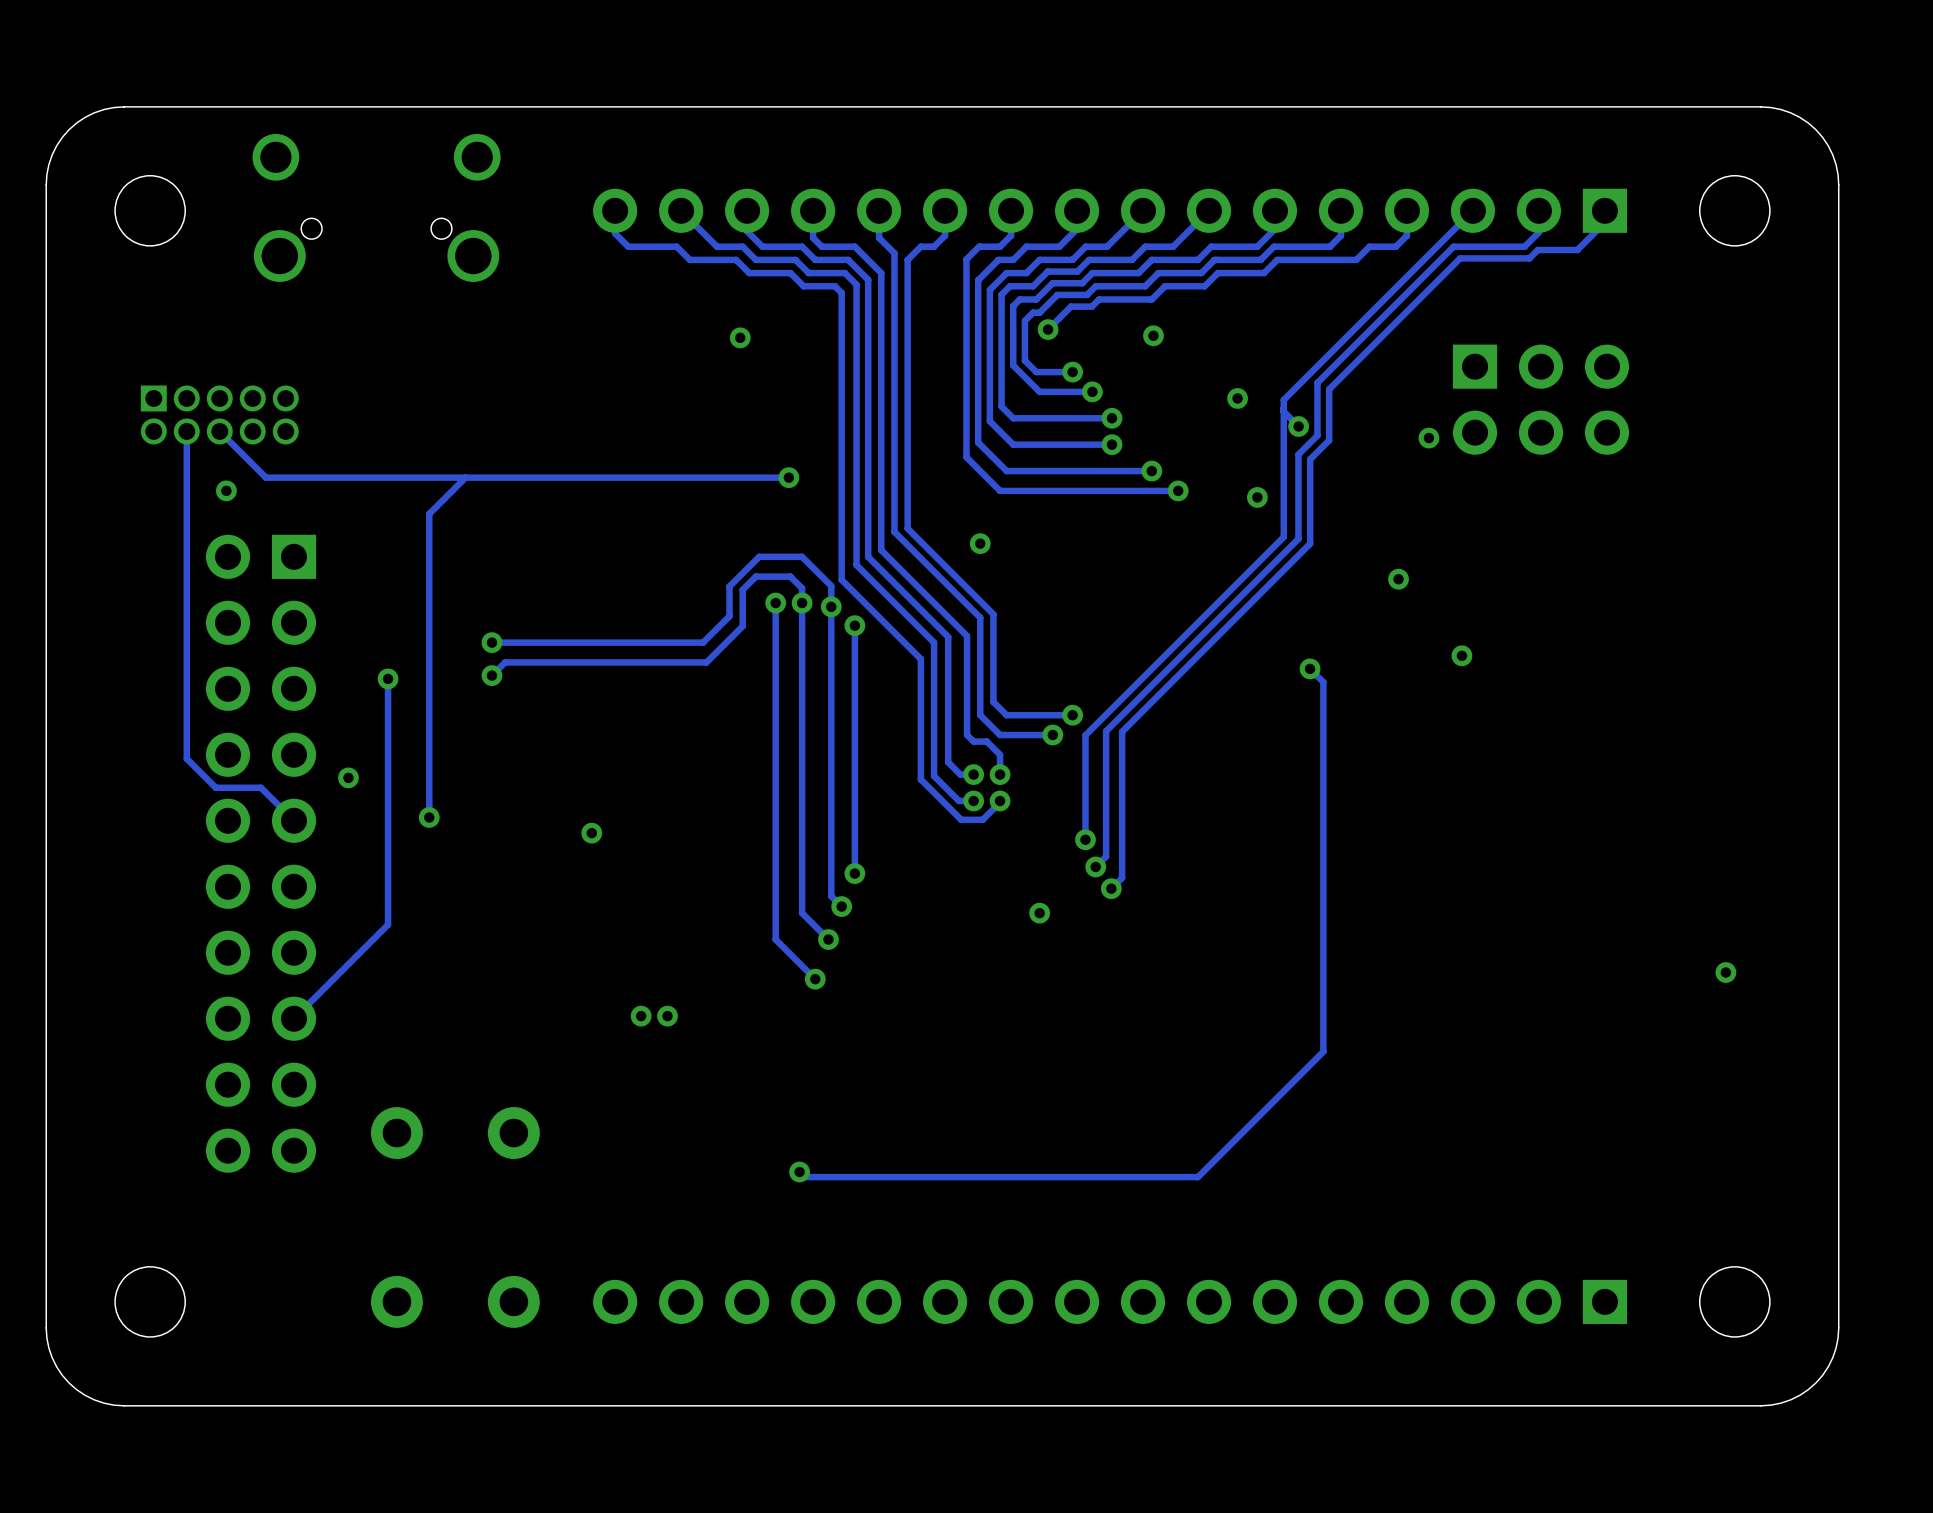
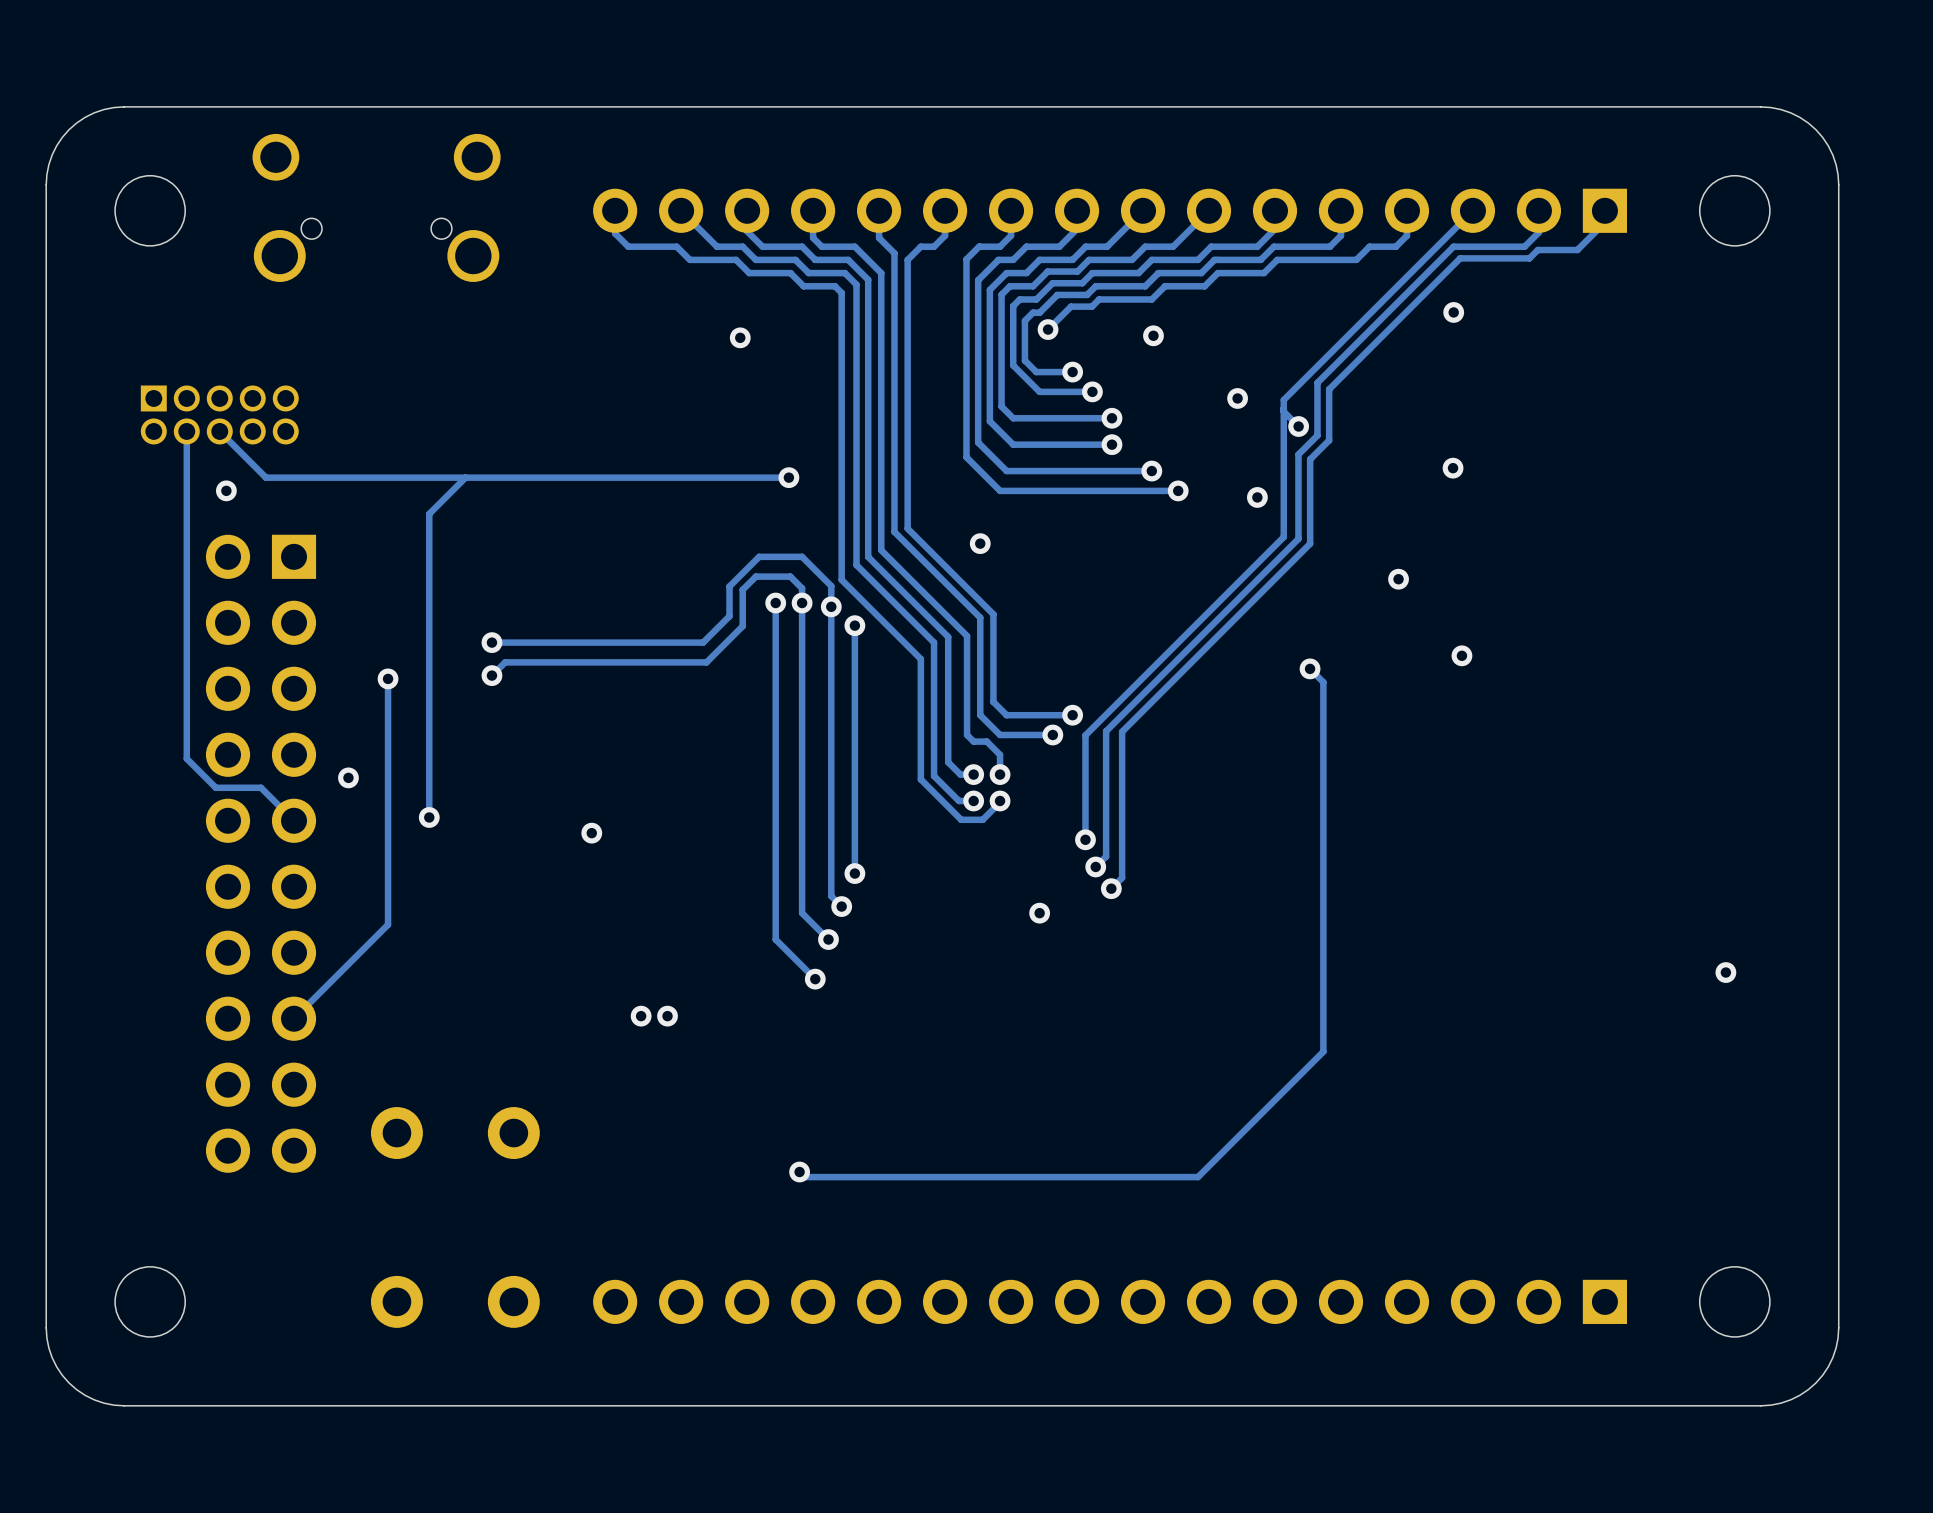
via: none -> (1453, 312)
part: (1541, 399) -> none
via position: (1428, 438) -> (1453, 468)

